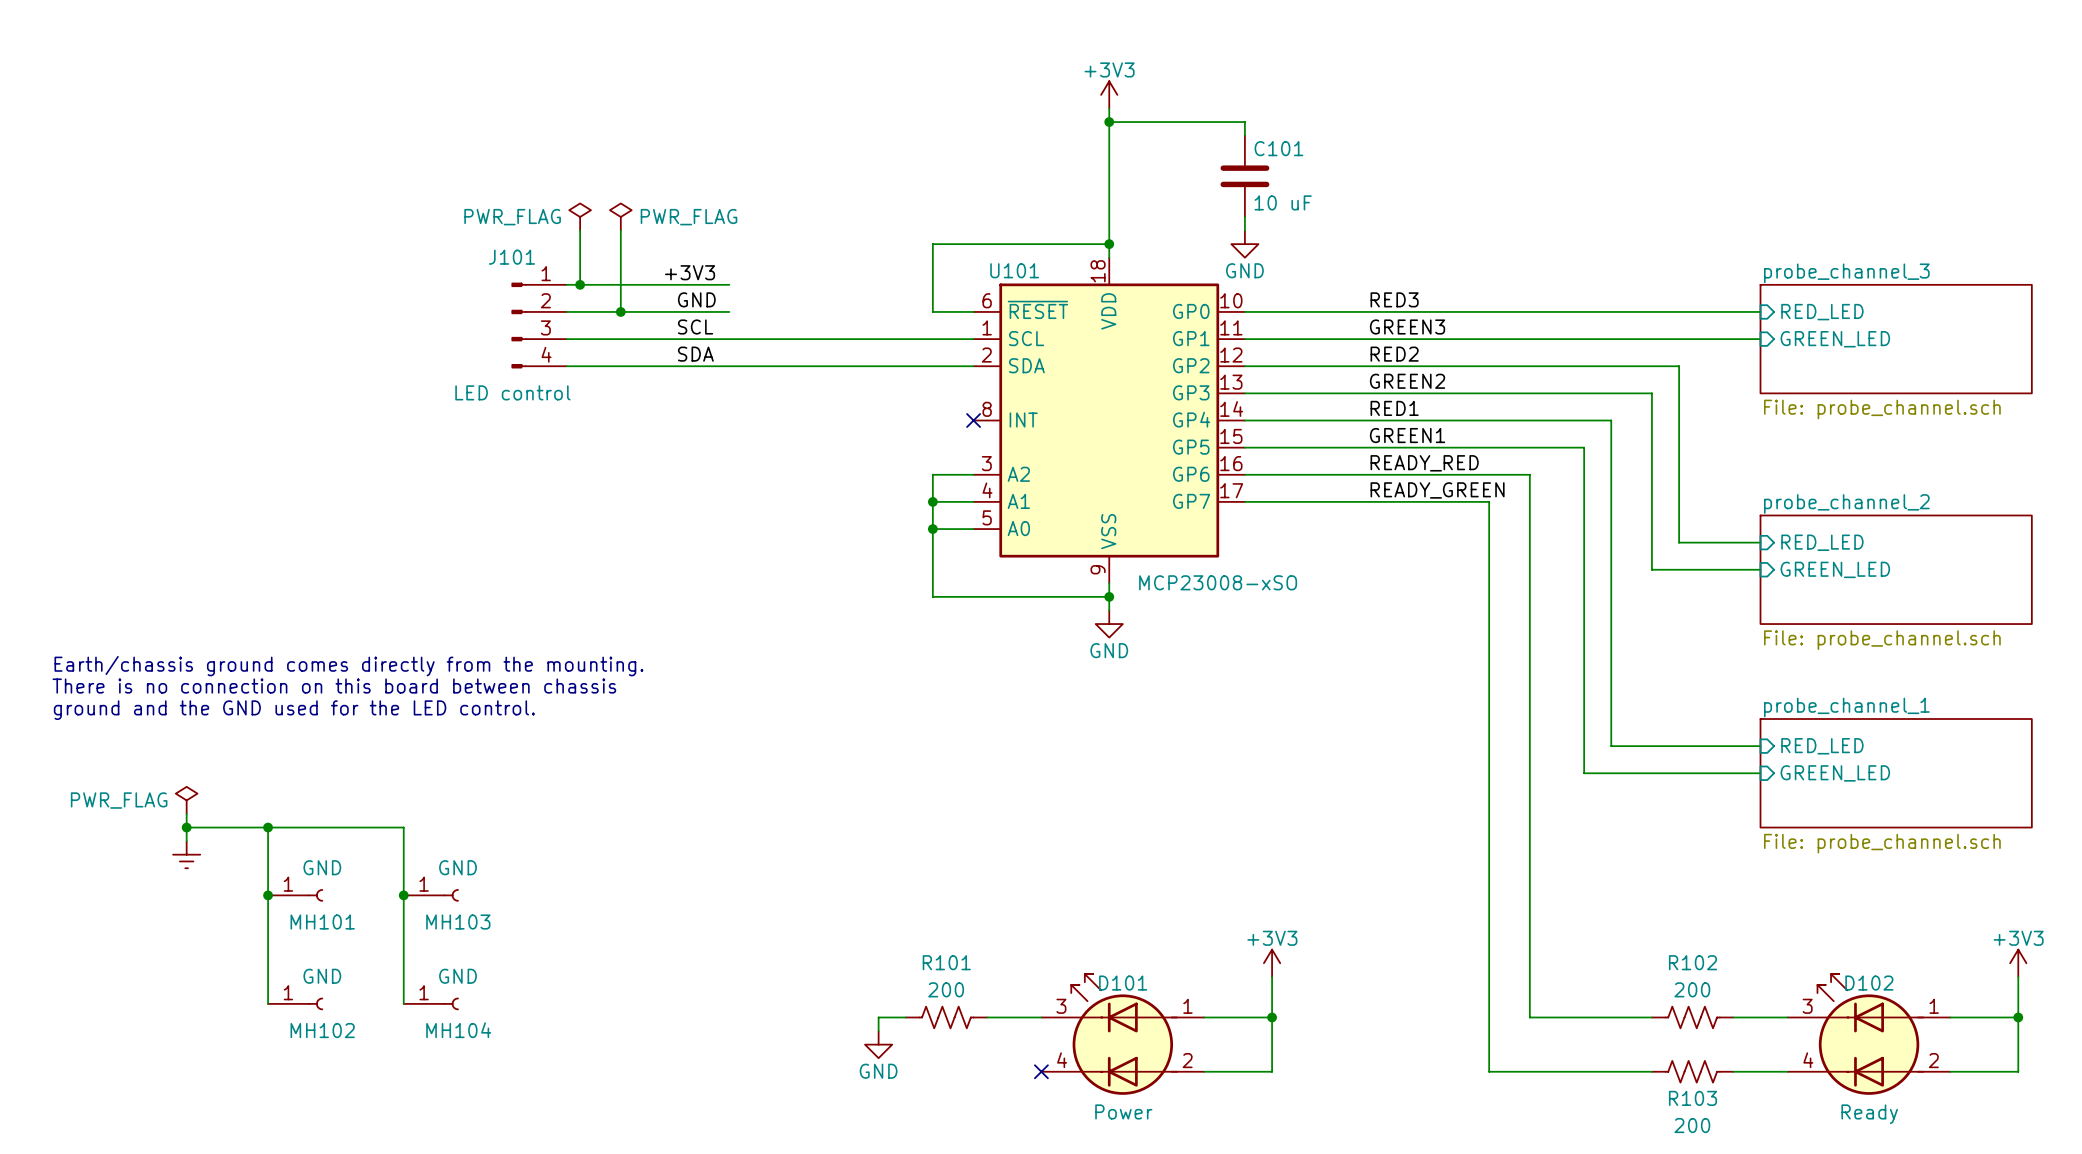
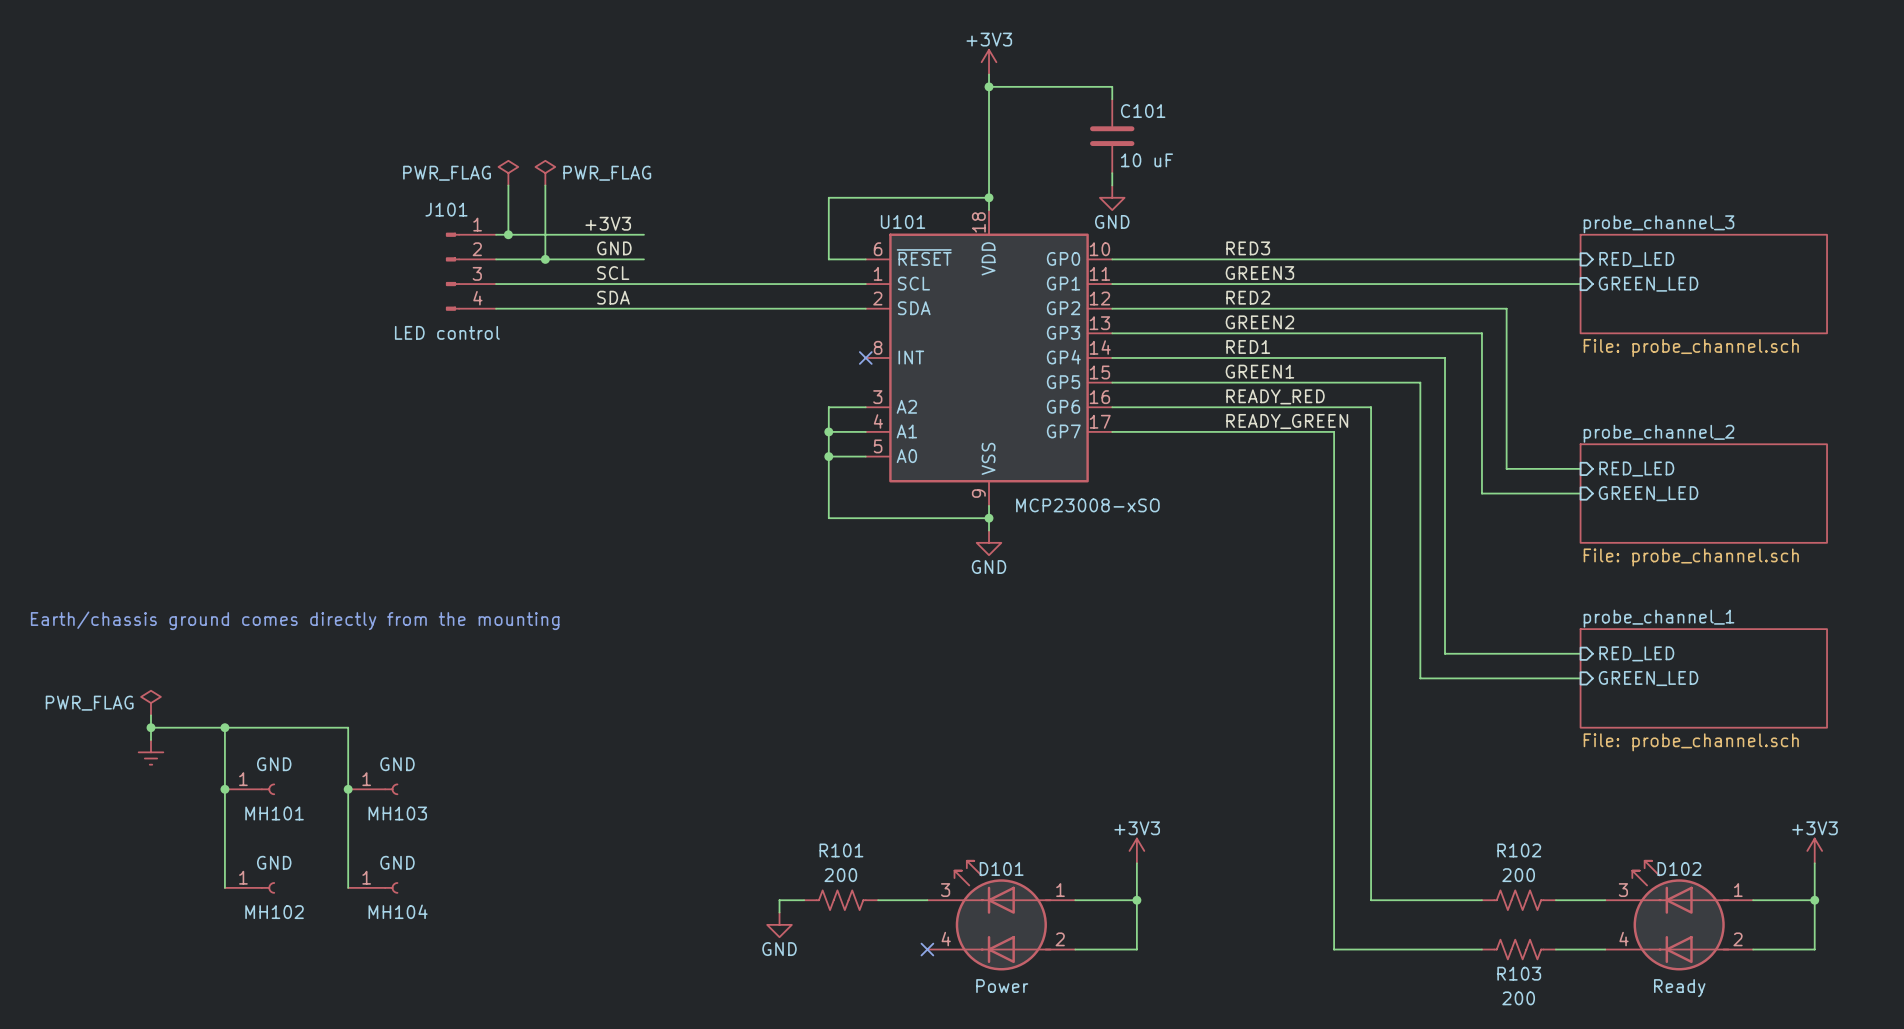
text: Earth/chassis ground comes directly from the mounting. (348, 666) -> none
text: There is no connection on this board between chassis (334, 686) -> none
text: ground and the GND used for the LED control. (294, 710) -> Earth/chassis ground comes directly from the mounting (295, 620)

